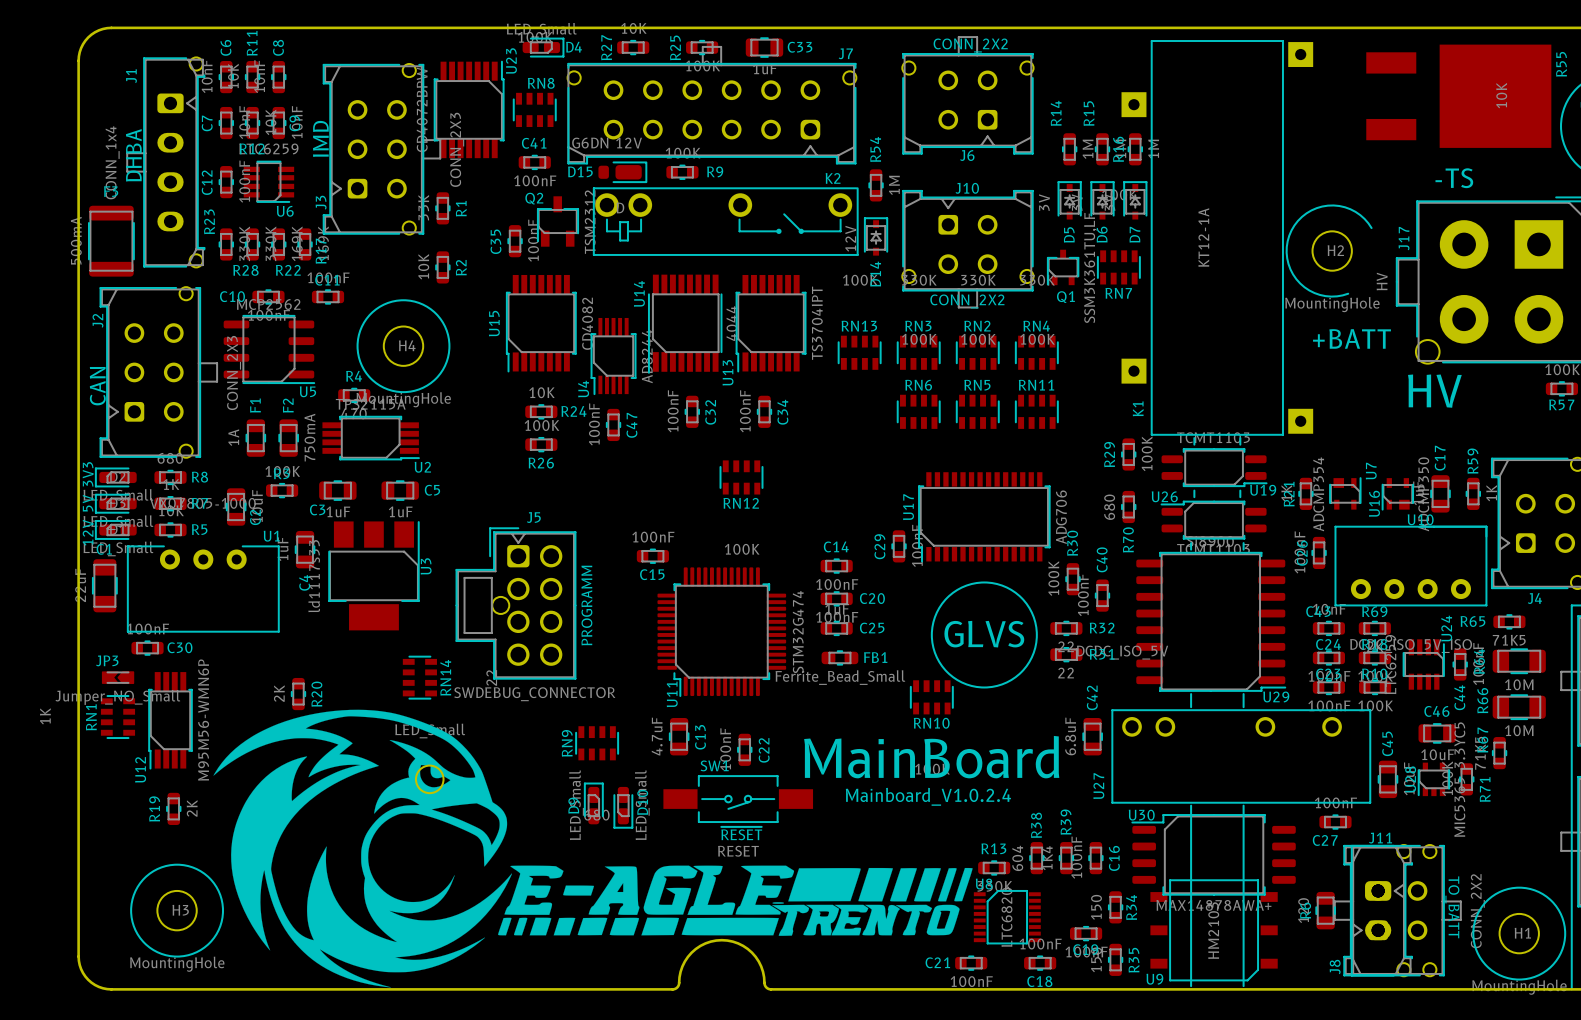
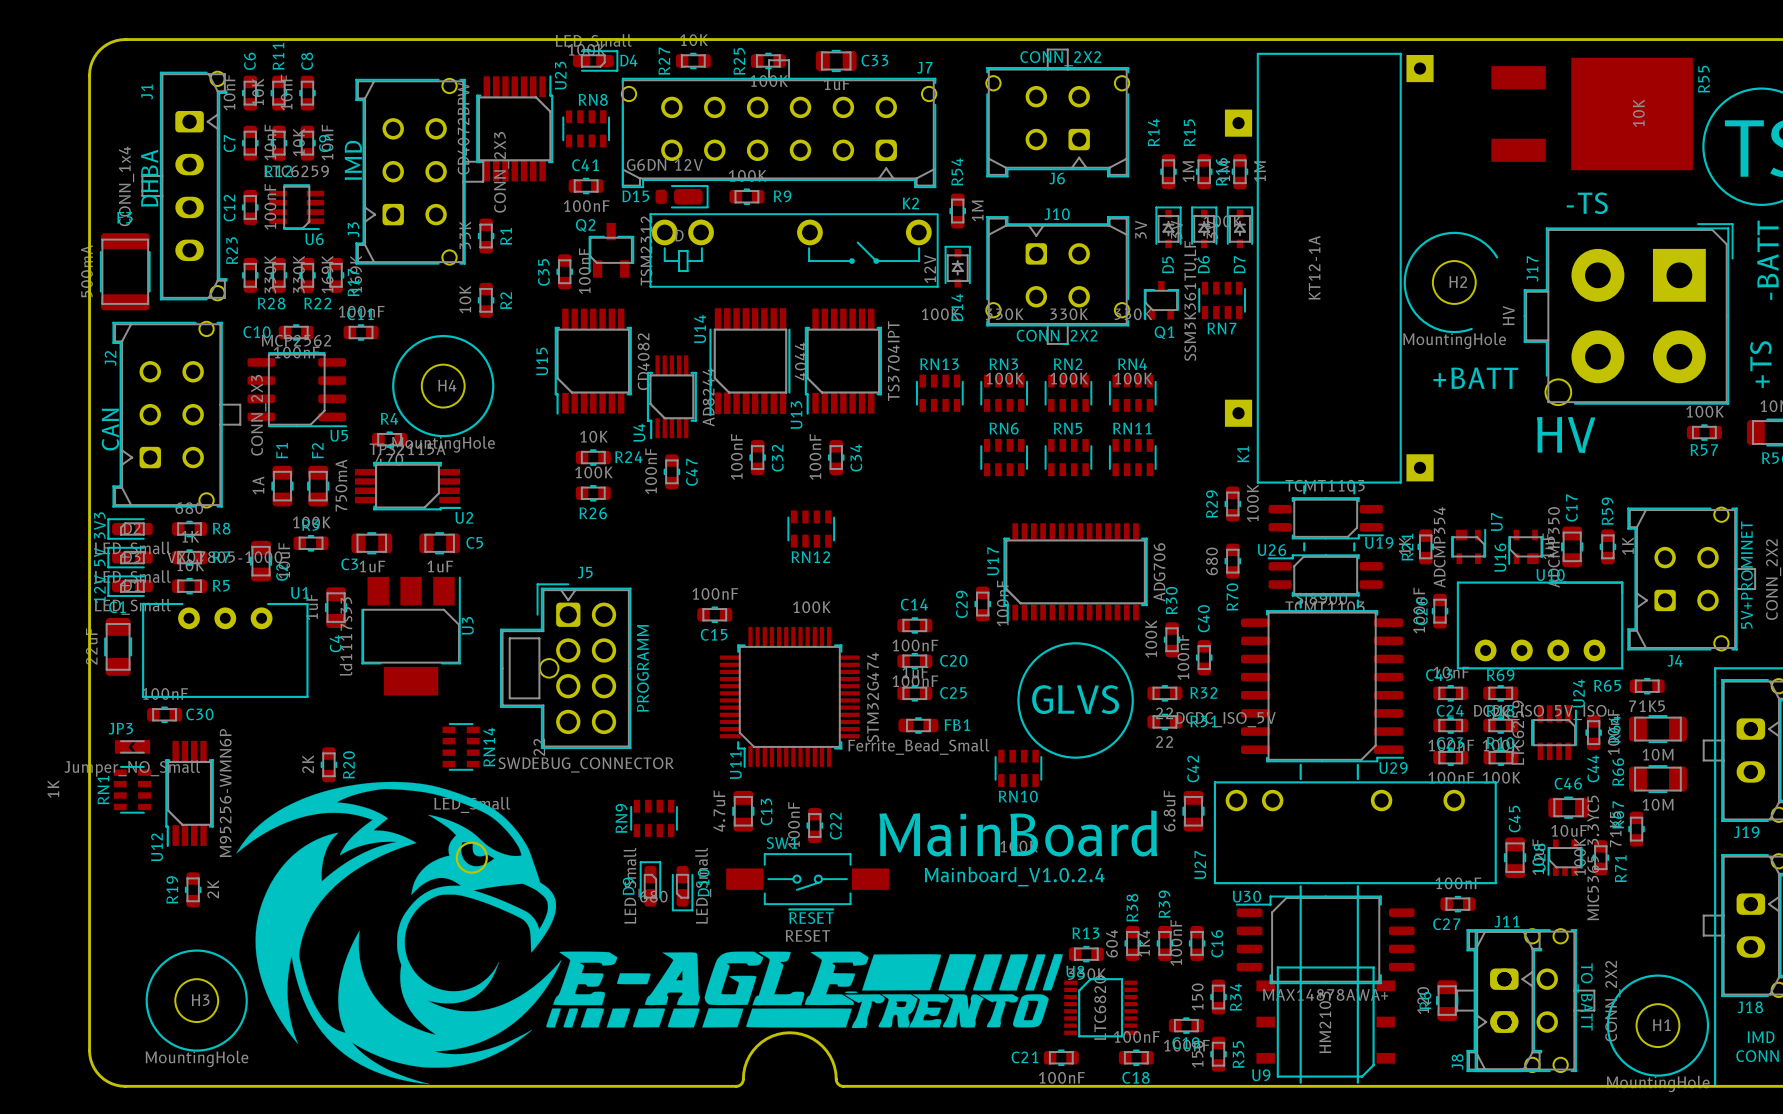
U12 value: M95M56-WMN6P (203, 720) -> M95256-WMN6P (225, 793)

